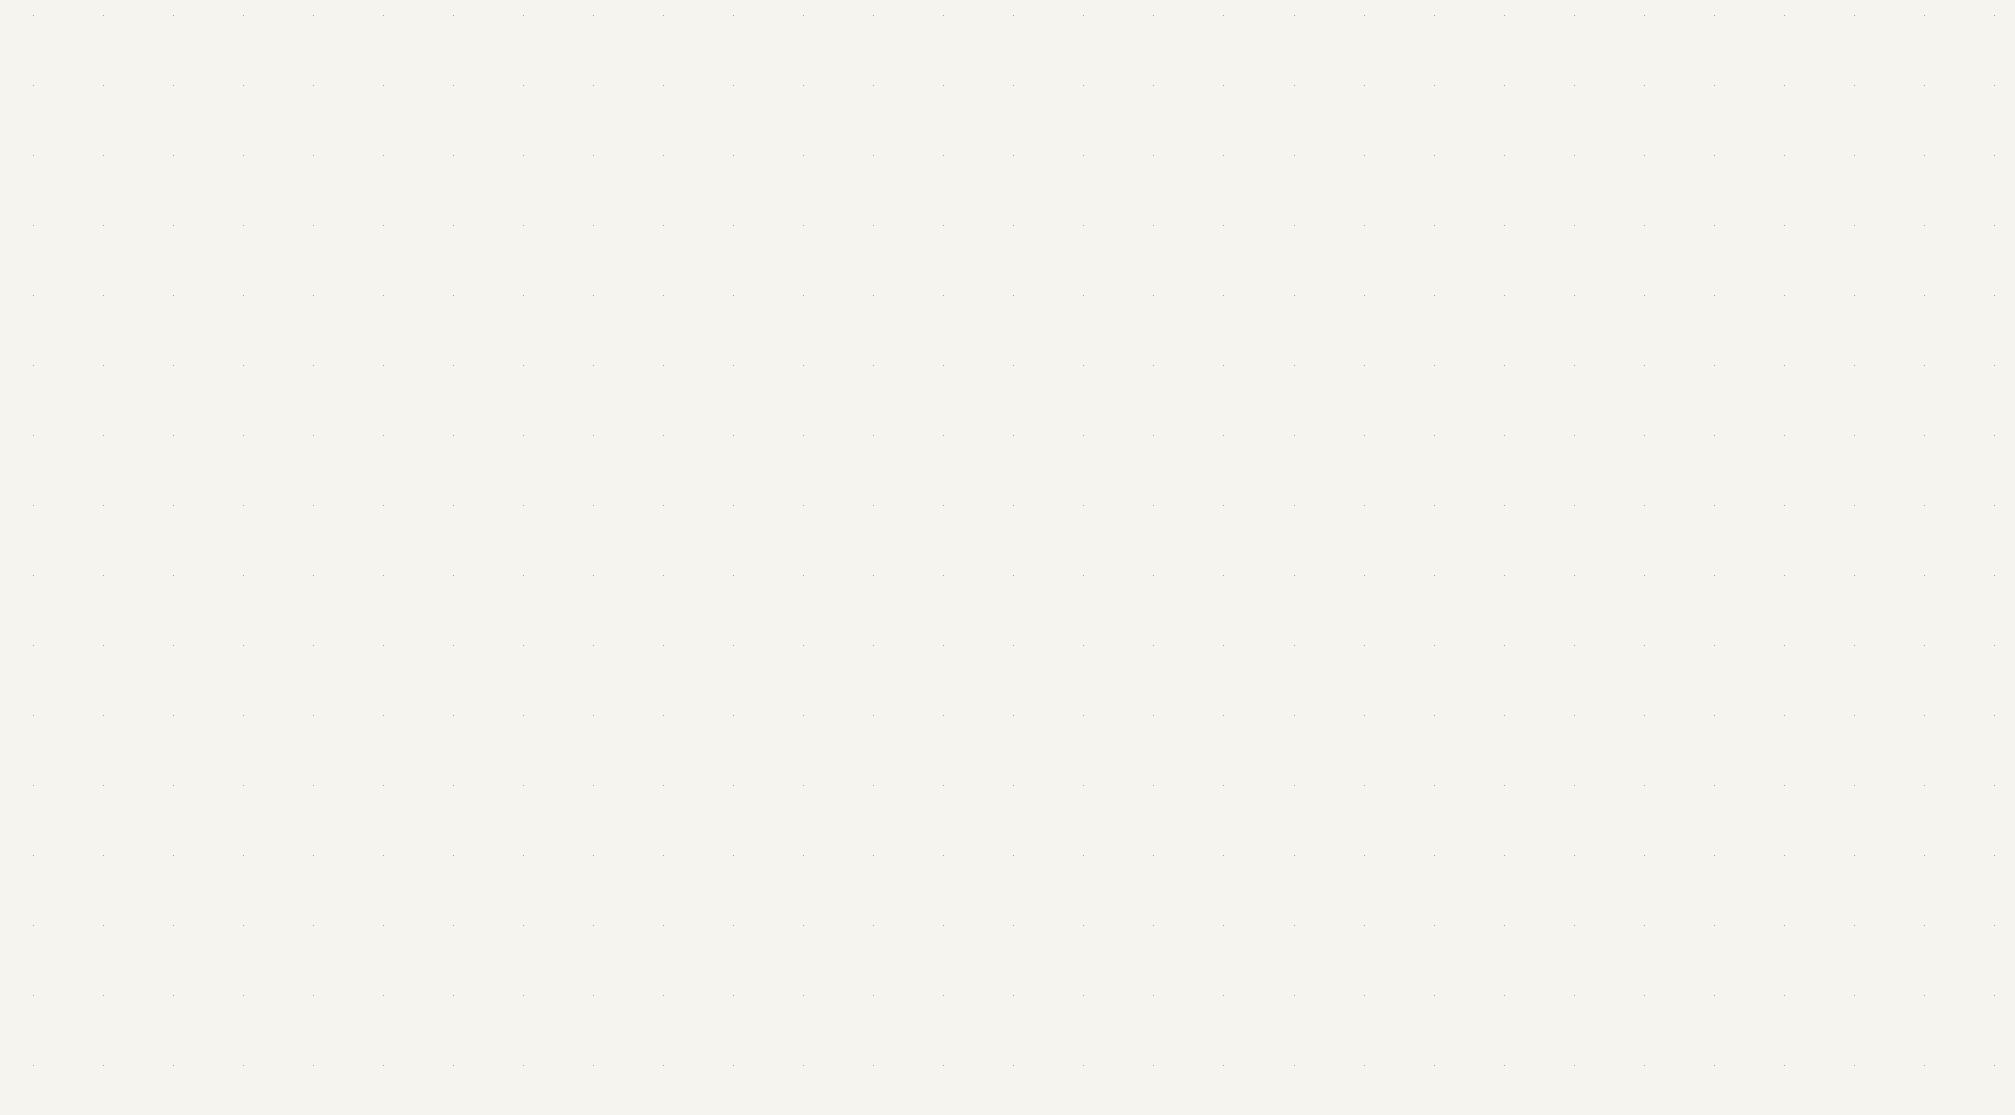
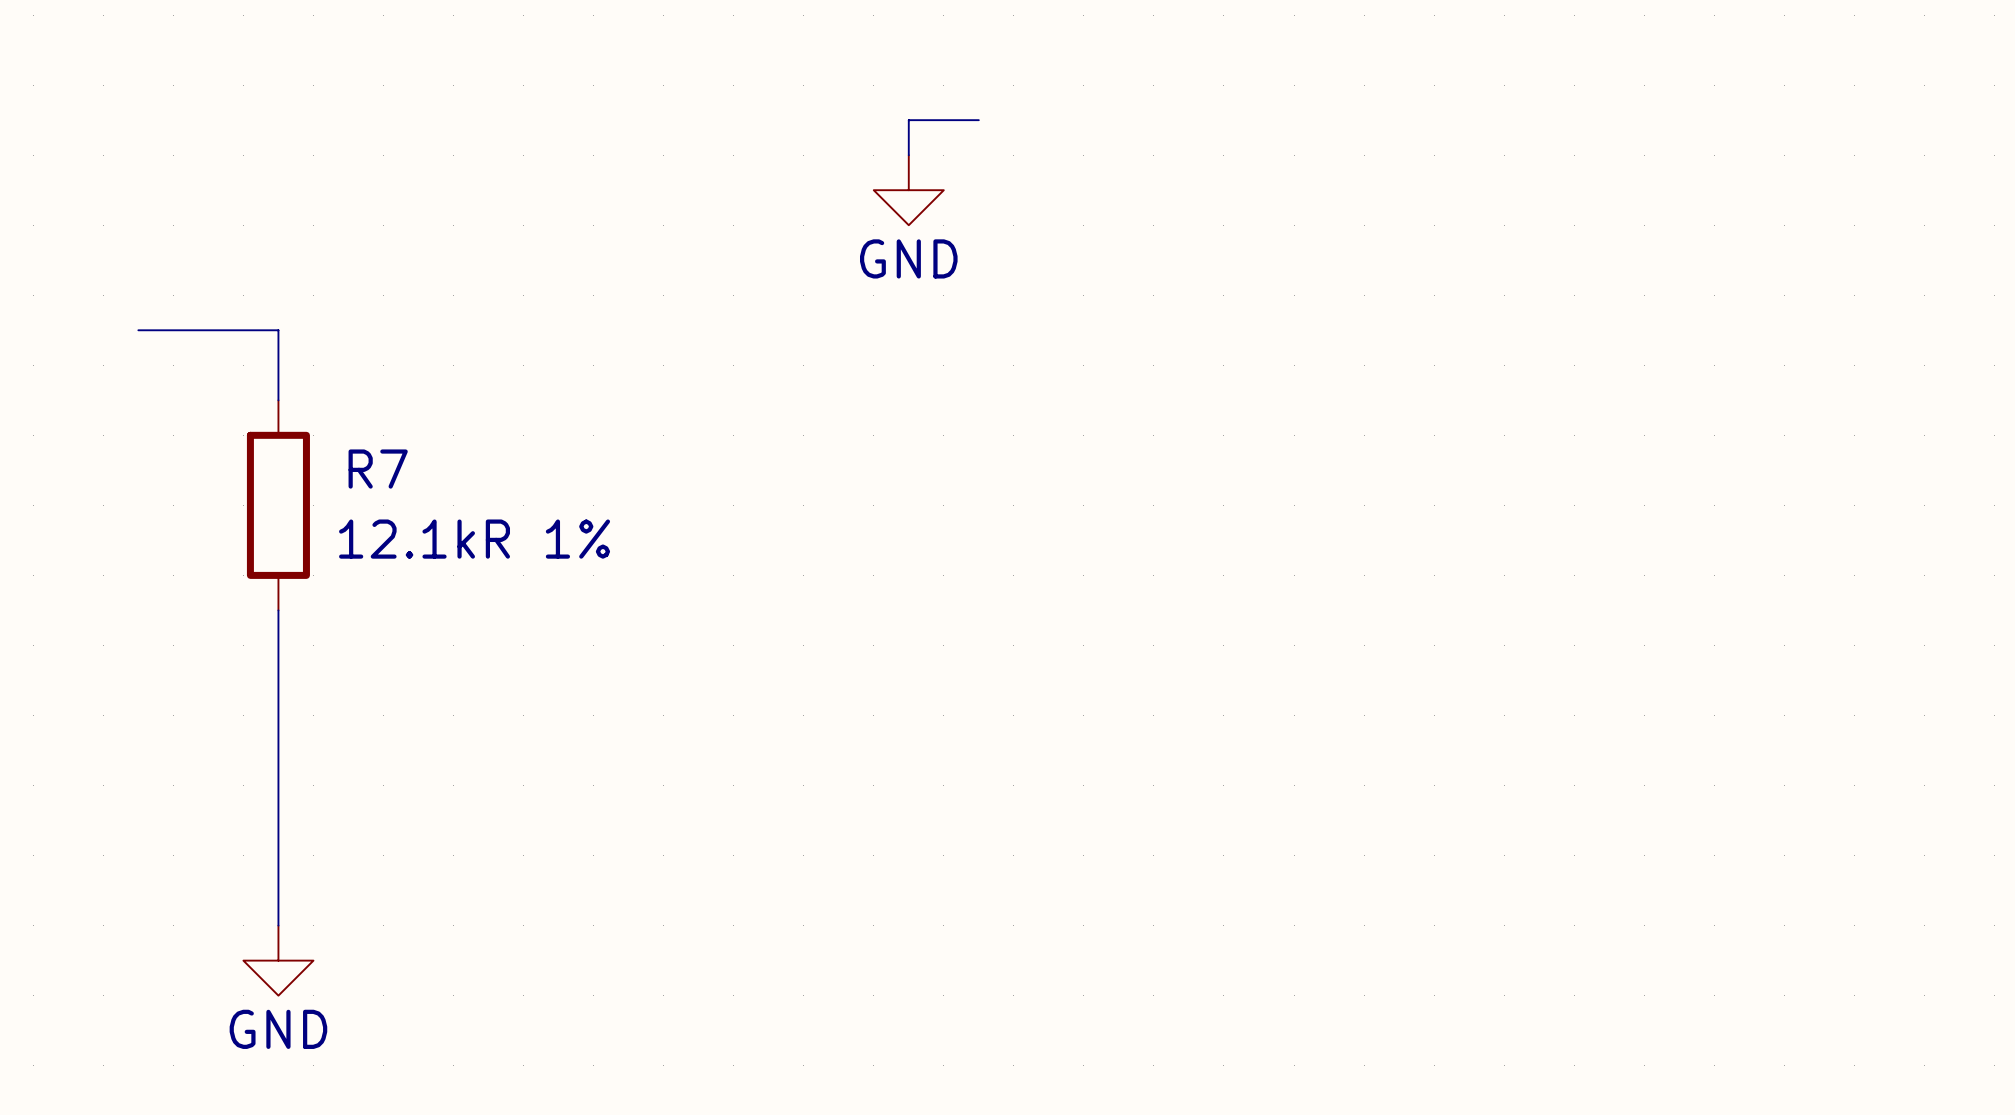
wire: none -> (978, 120) (908, 120) (908, 155)
power symbol: none -> GND (908, 190)
wire: none -> (138, 330) (278, 330) (278, 400)
R7: none -> 12.1kR 1% (278, 505)
wire: none -> (278, 610) (278, 925)
power symbol: none -> GND (278, 960)

